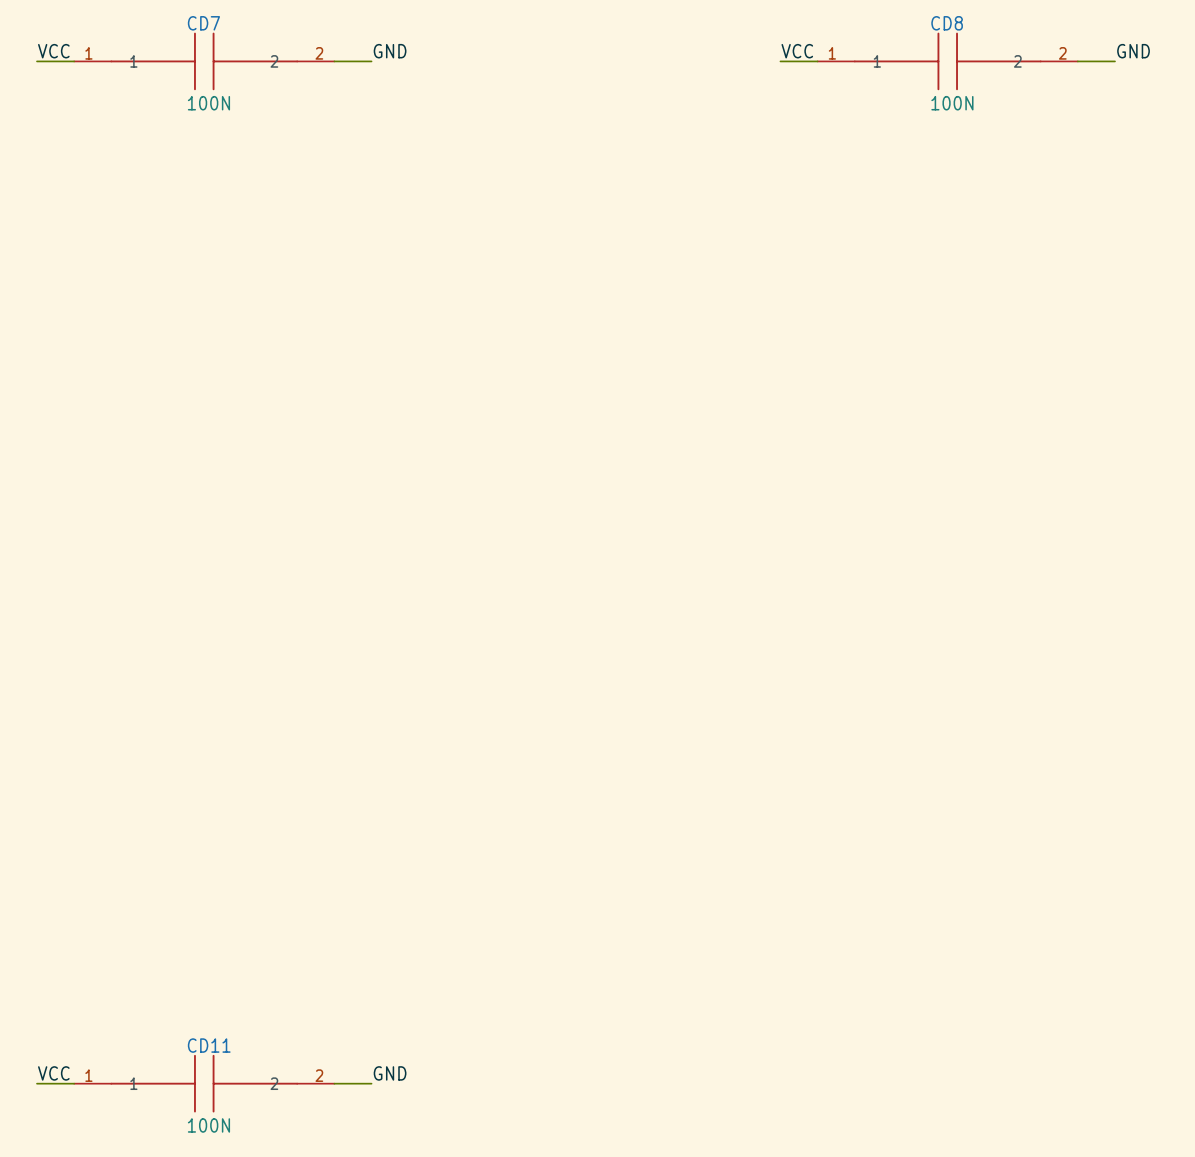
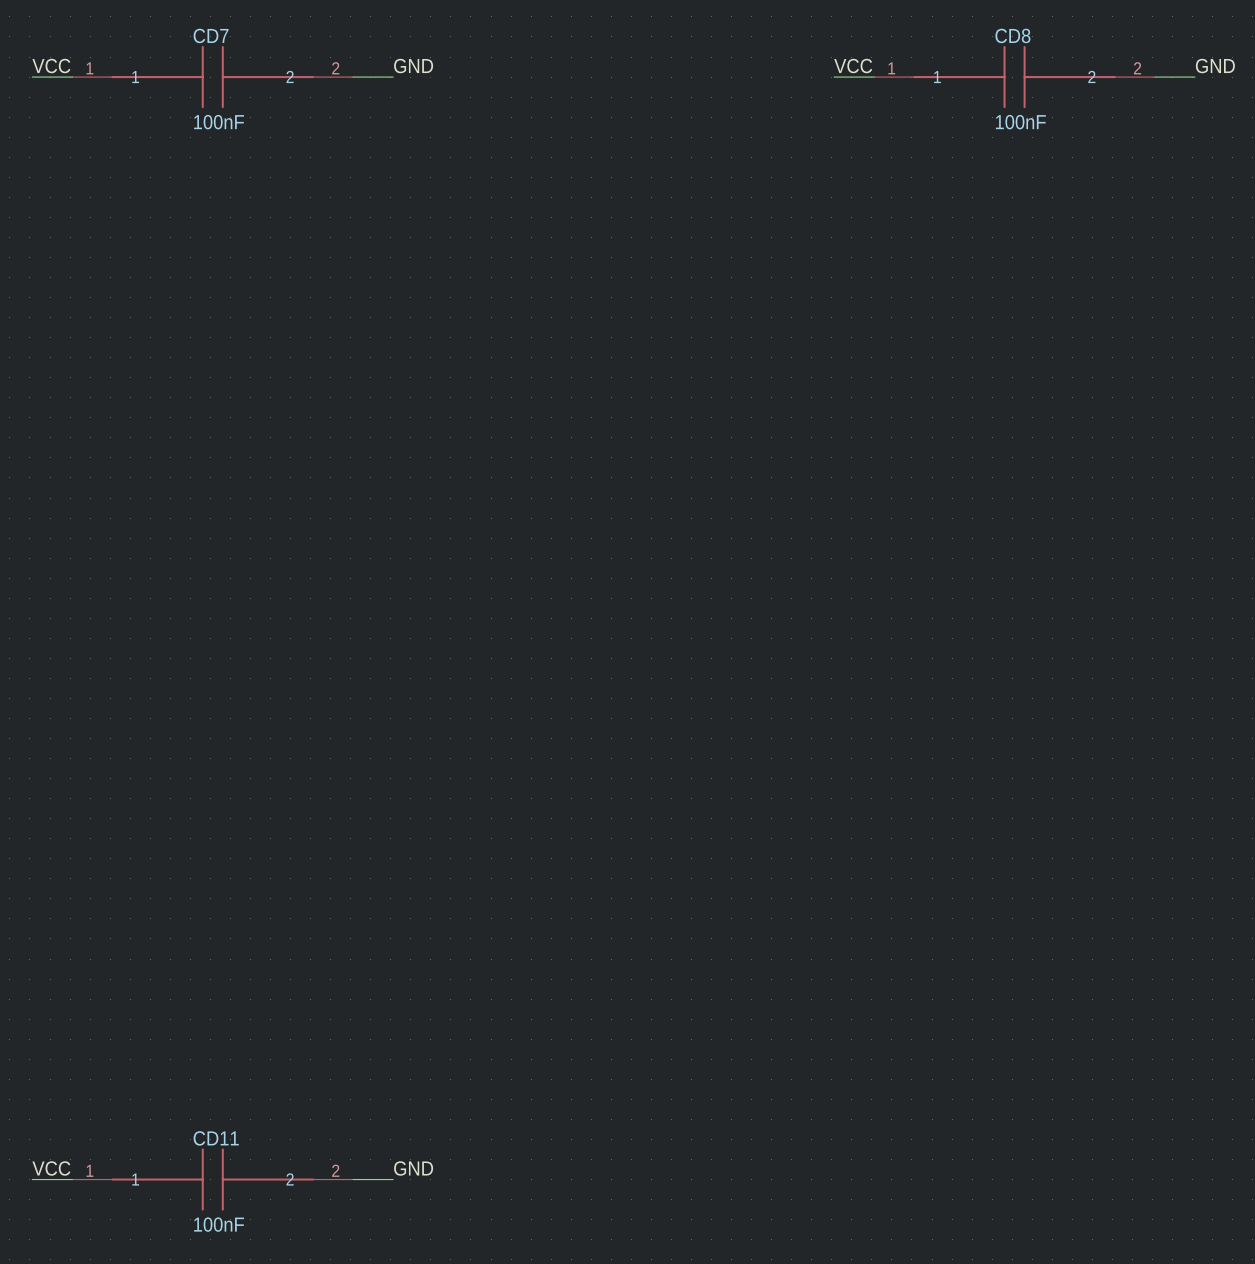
CD7 value: 100N (208, 103) -> 100nF (219, 122)
CD8 value: 100N (952, 103) -> 100nF (1020, 122)
CD11 value: 100N (208, 1125) -> 100nF (219, 1224)

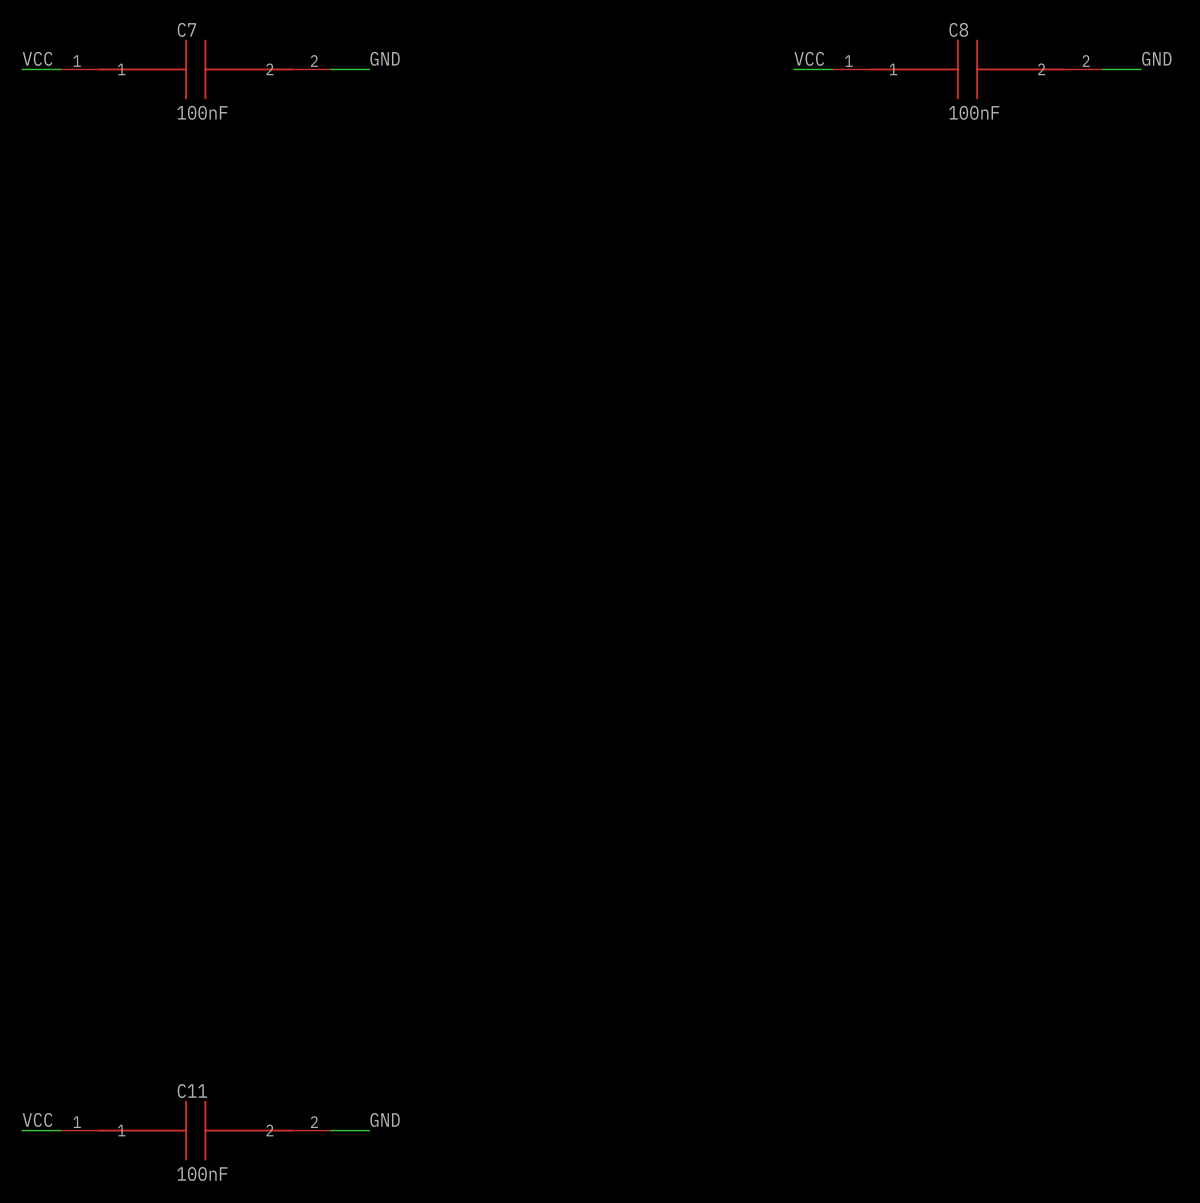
CD7 name: CD7 (211, 35) -> C7 (186, 29)
CD8 name: CD8 (1012, 35) -> C8 (958, 29)
CD11 name: CD11 (216, 1138) -> C11 (192, 1091)

